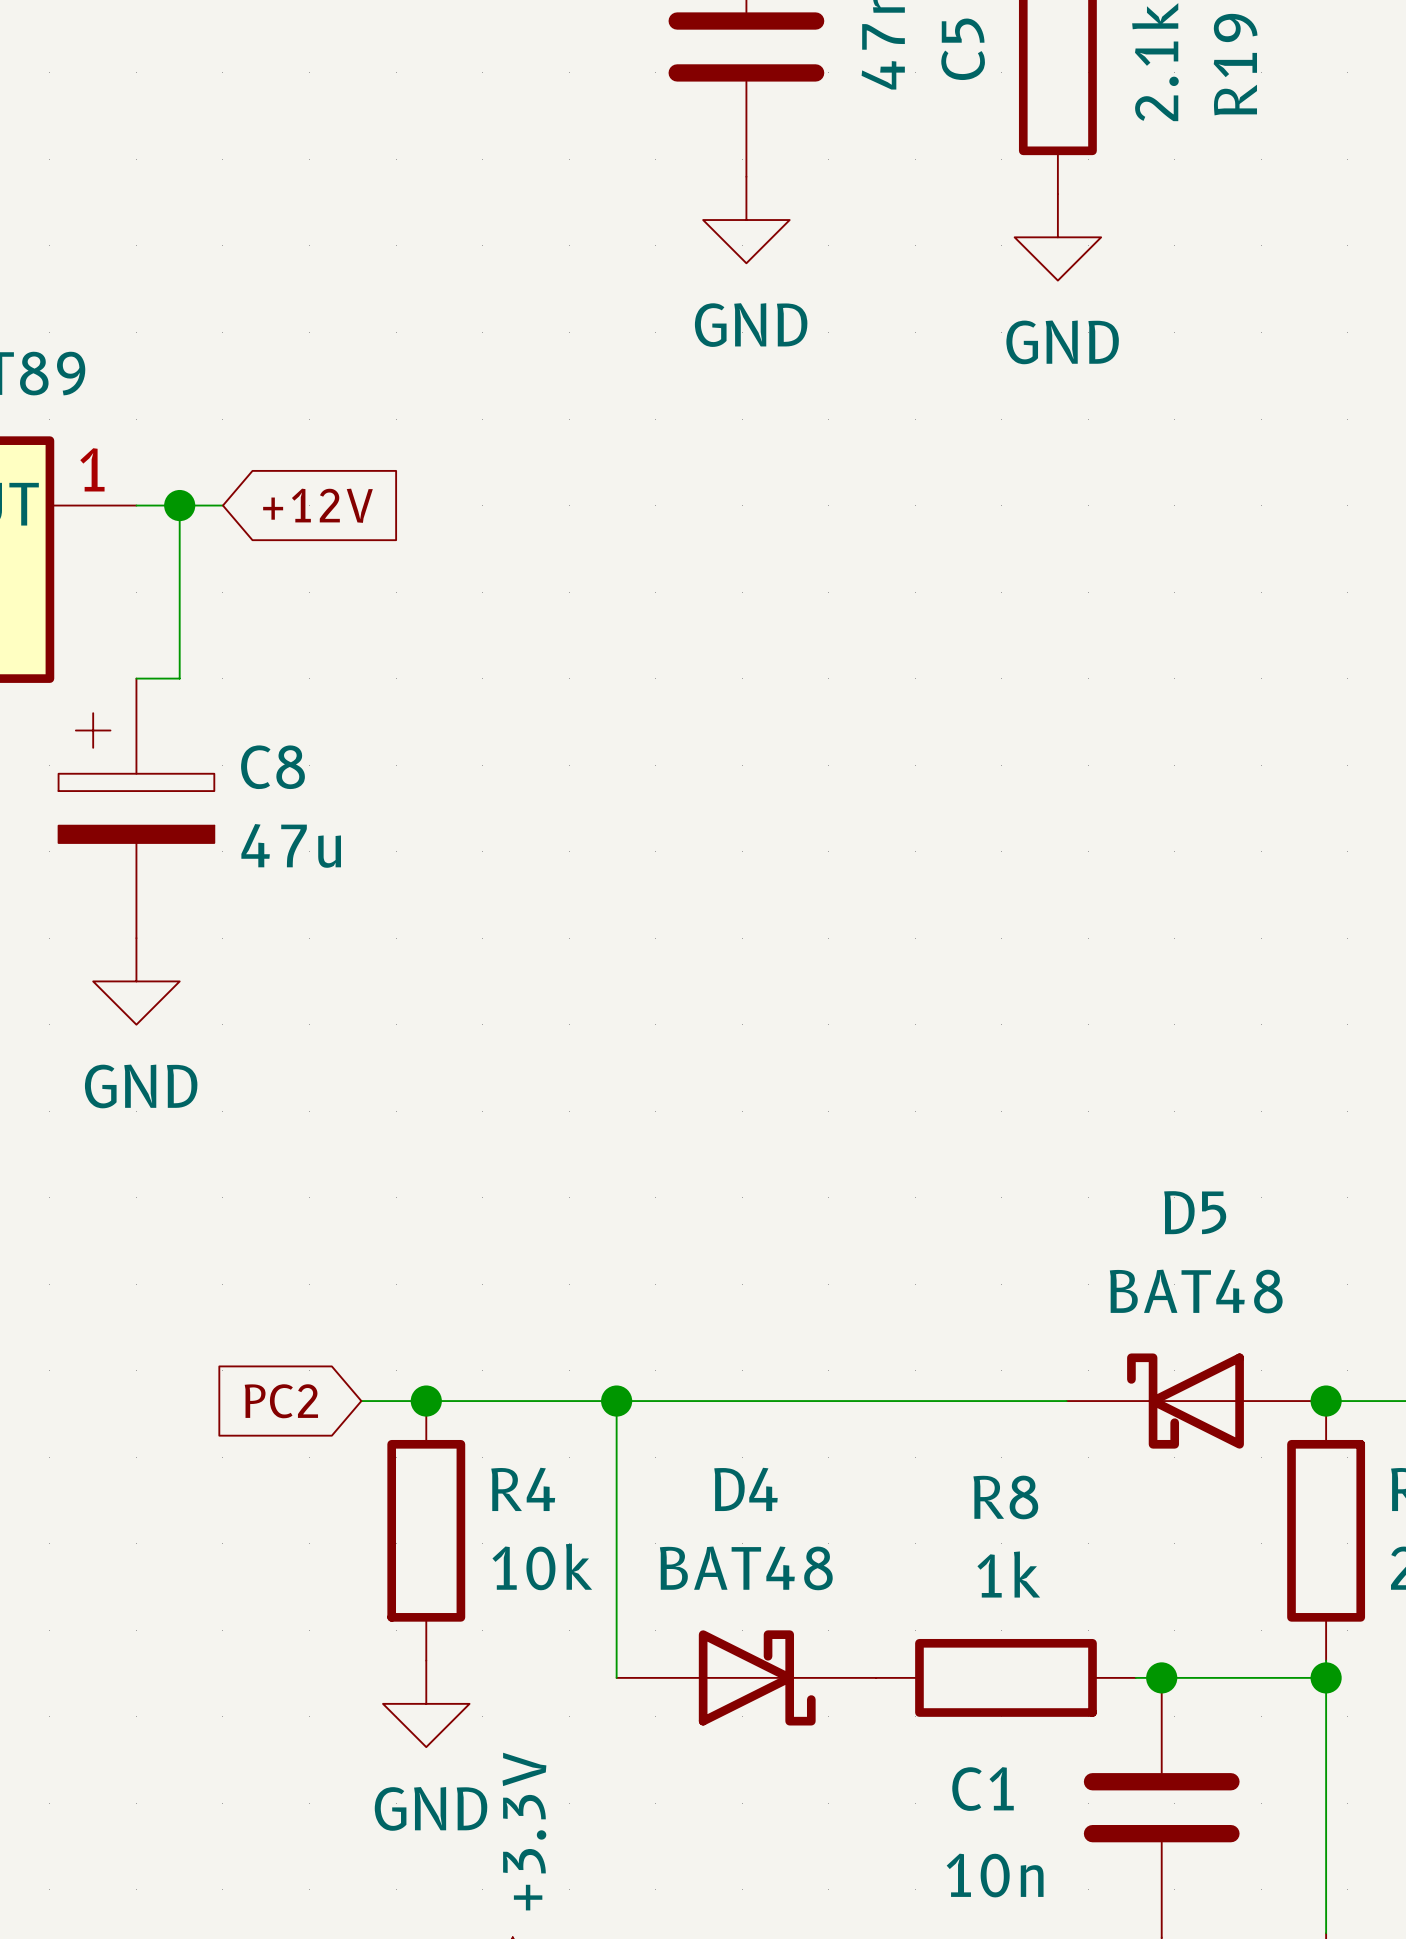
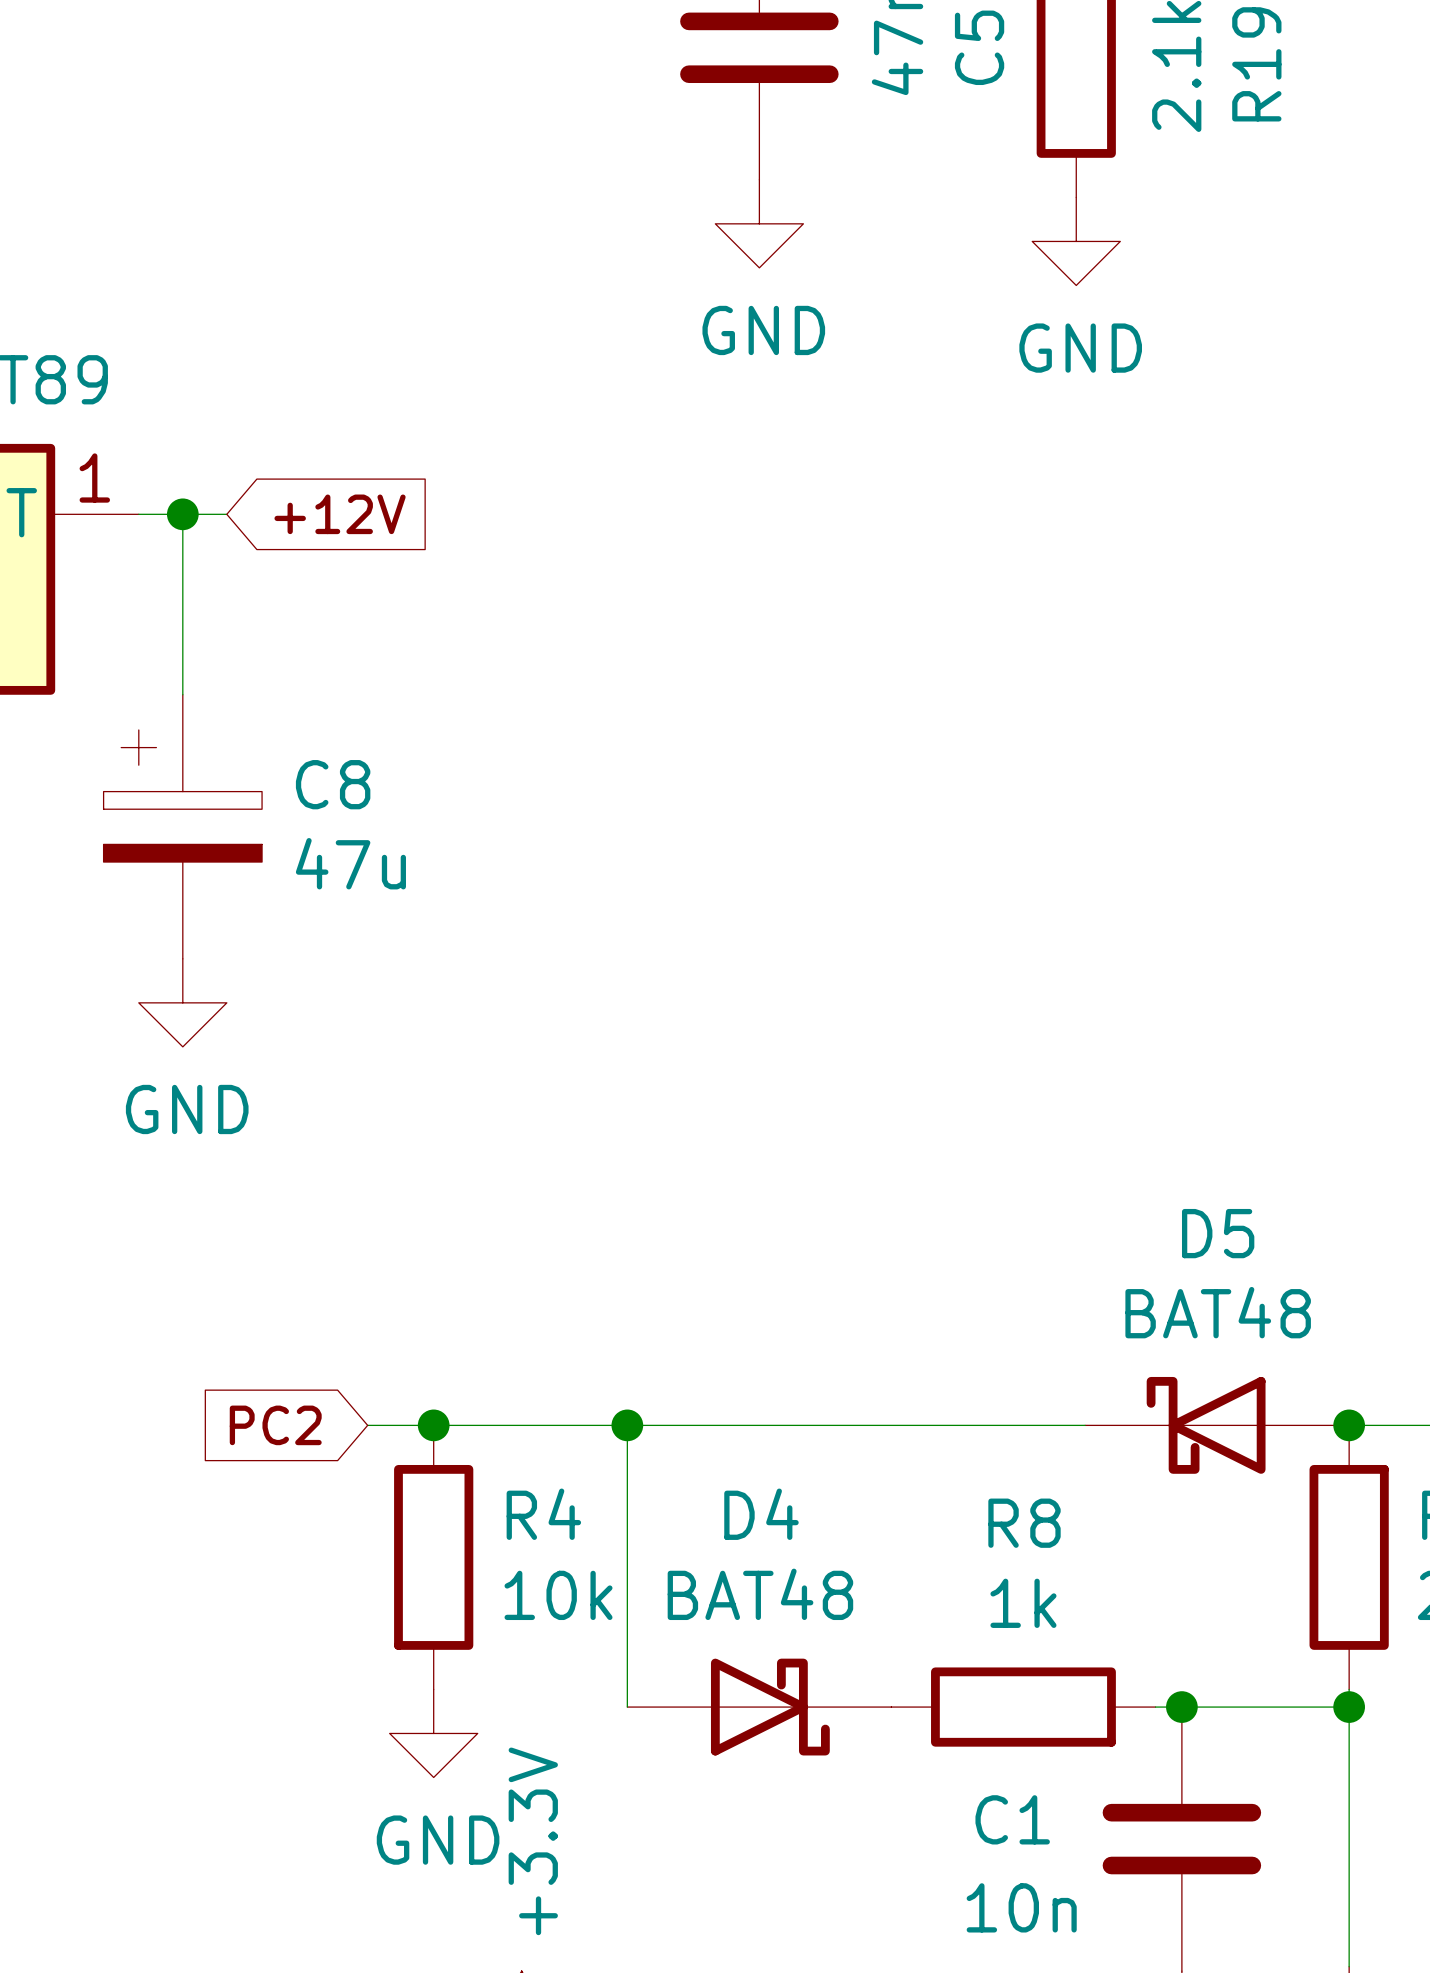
wire: (136, 678) (179, 678) -> (182, 694) (182, 690)
C8 position: (136, 808) -> (182, 826)
power symbol position: GND (136, 981) -> GND (182, 1002)

